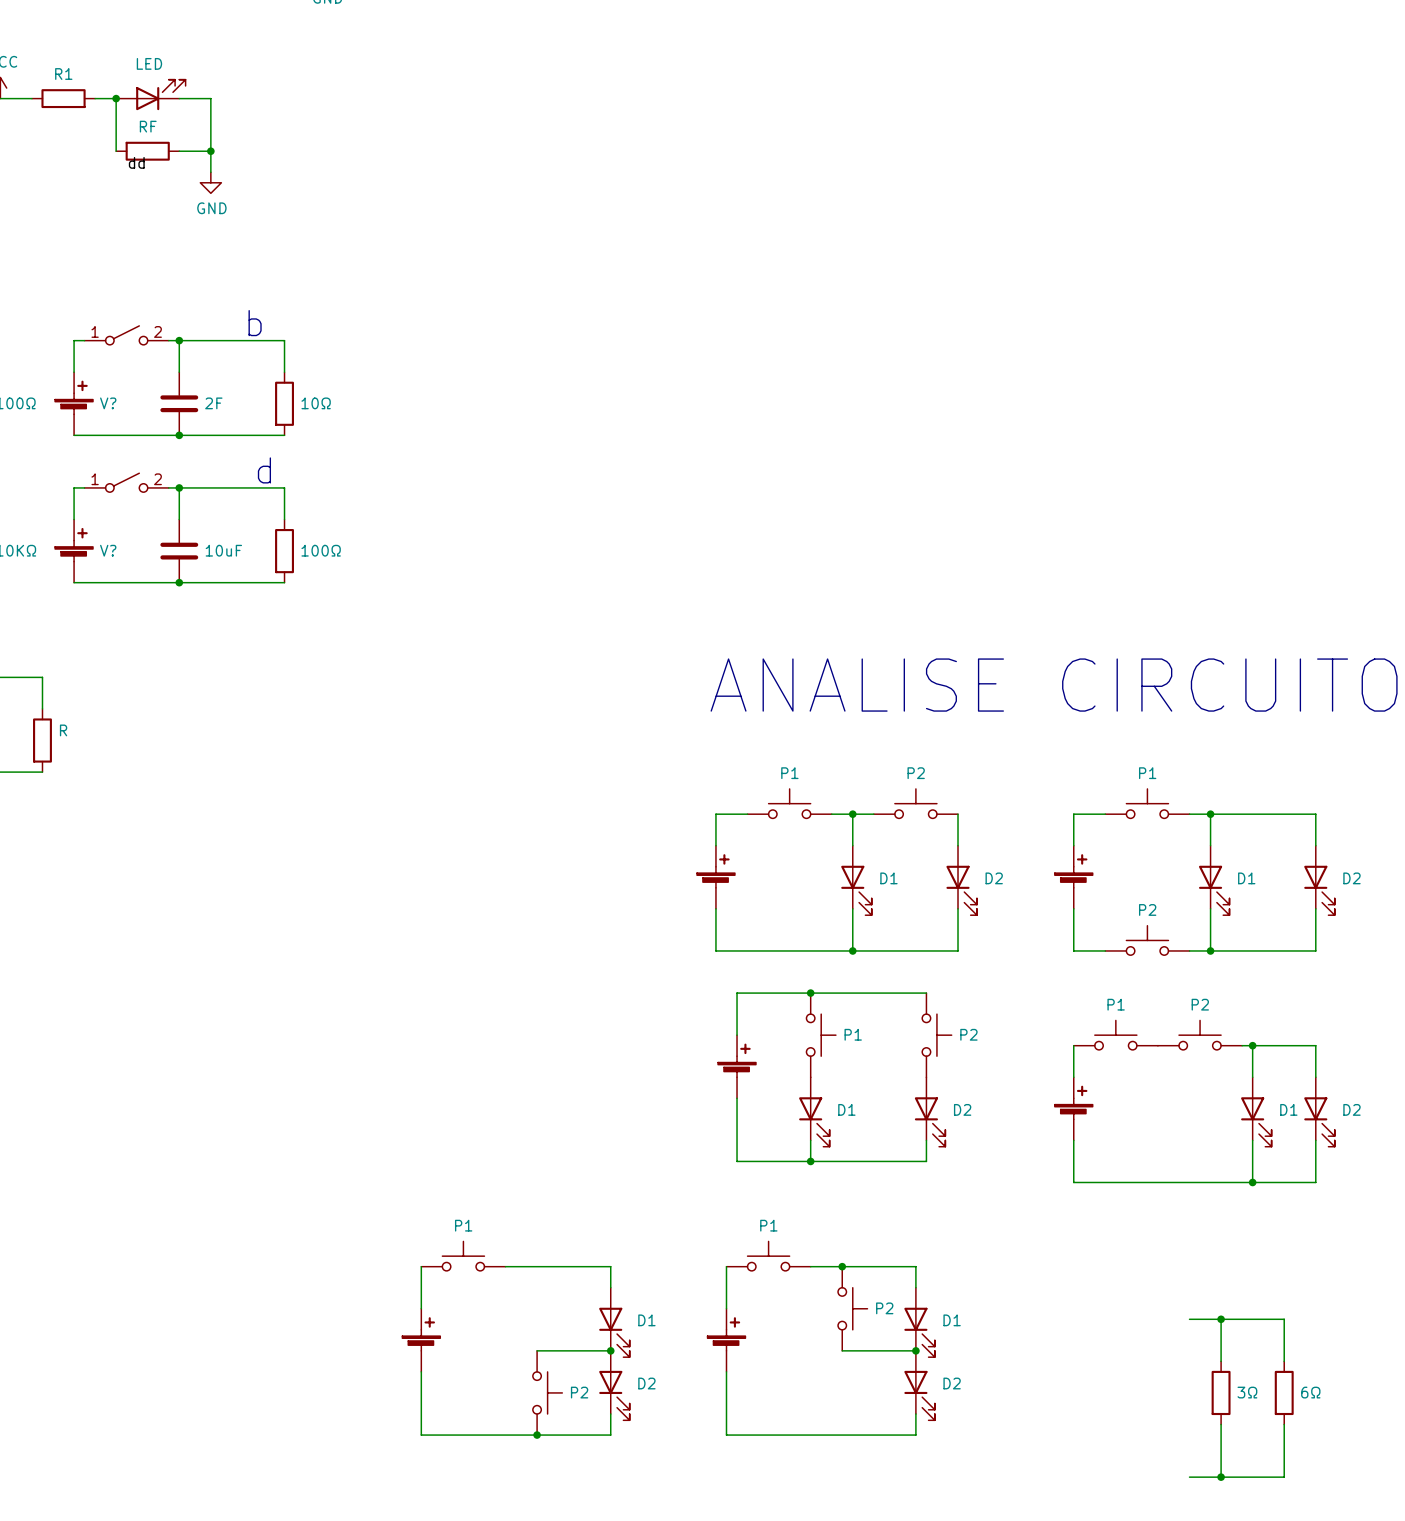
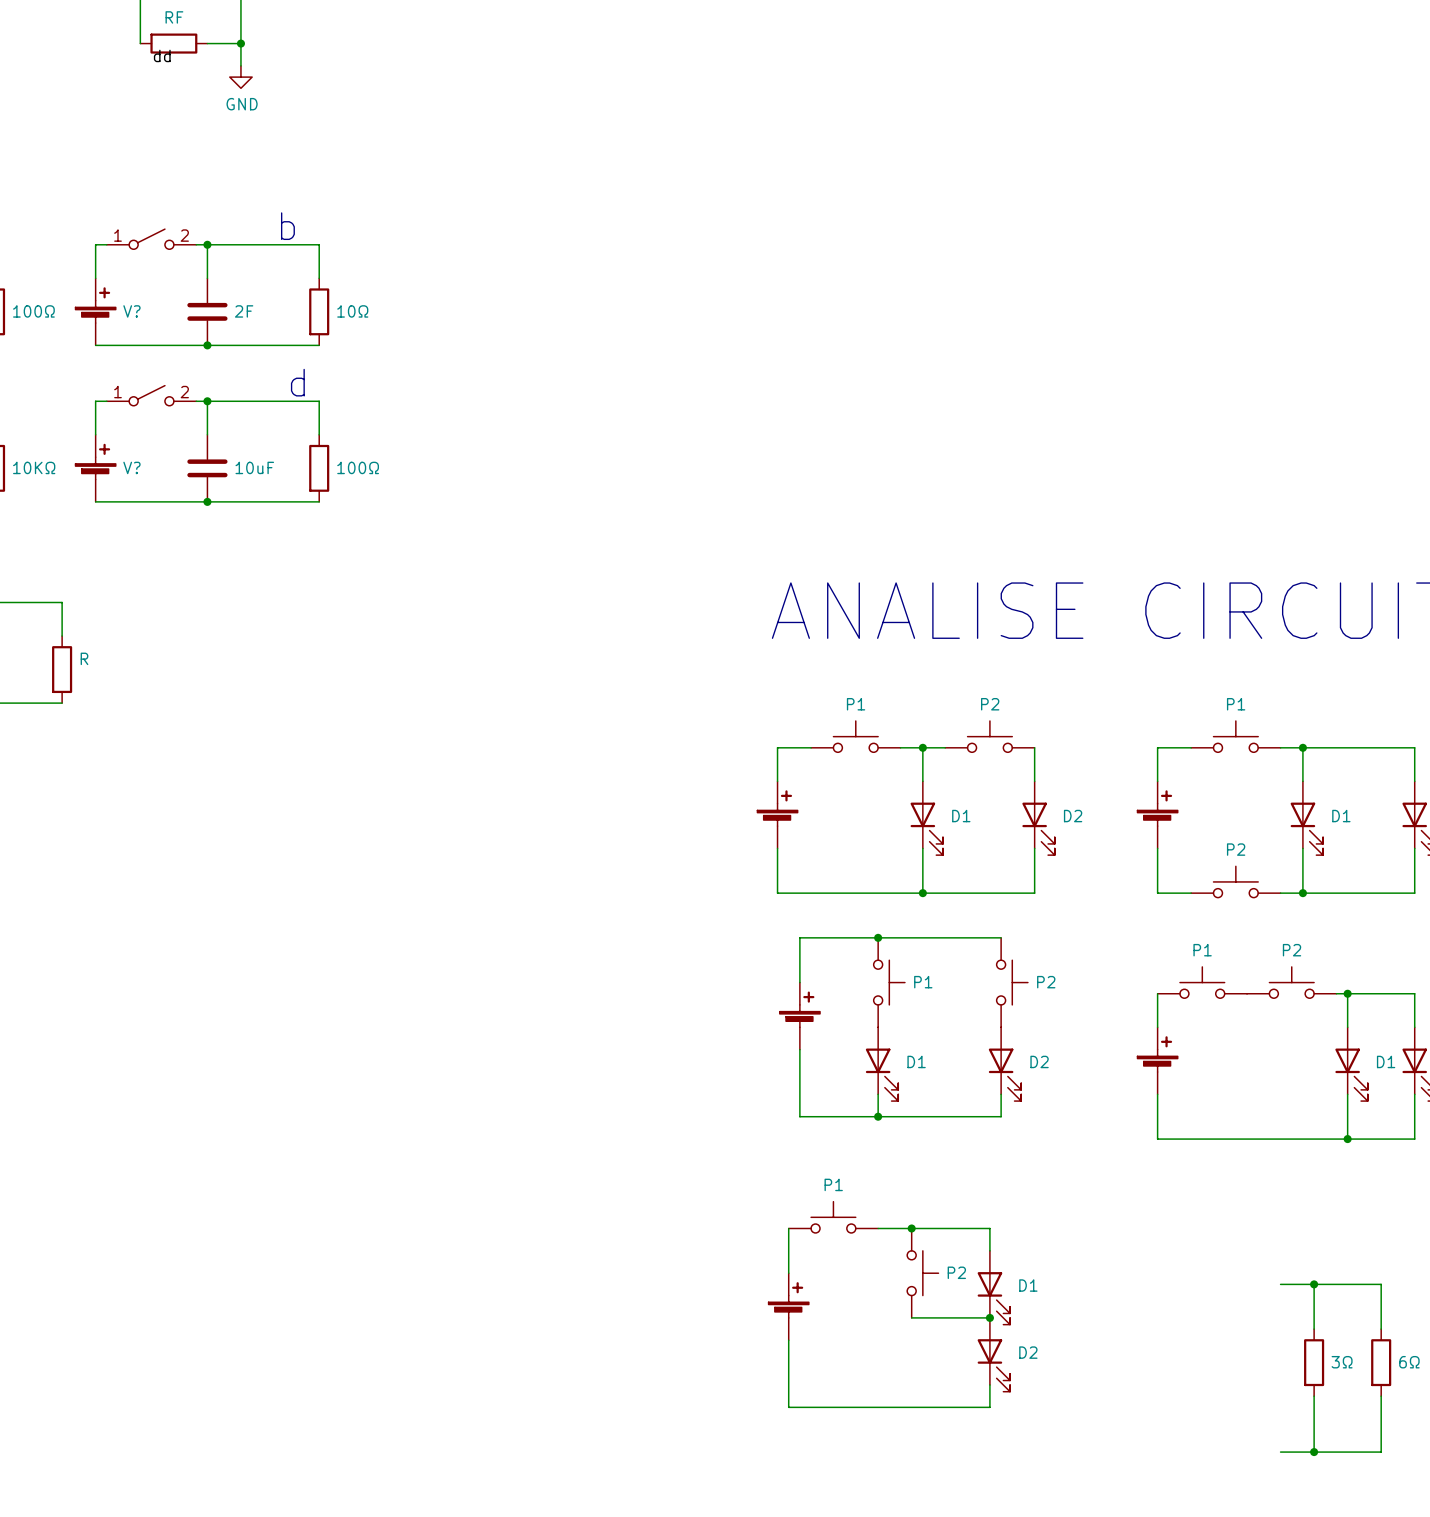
P1: (463, 1256) -> none
wire: (421, 1266) (421, 1308) -> none
wire: (505, 1266) (610, 1266) (610, 1287) -> none
D1: (614, 1322) -> none
part: (421, 1340) -> none
wire: (537, 1350) (610, 1350) -> none
junction: (610, 1350) -> none
wire: (421, 1371) (421, 1435) (610, 1435) (610, 1414) -> none
D2: (614, 1385) -> none
P2: (547, 1392) -> none
junction: (537, 1435) -> none

